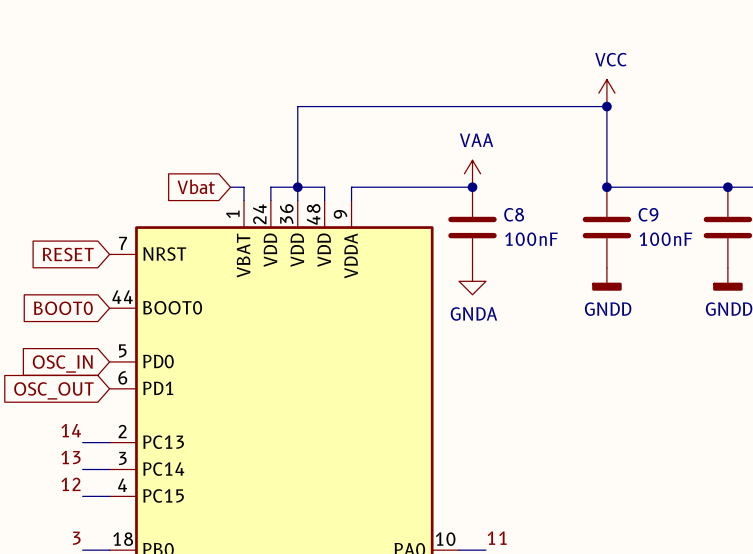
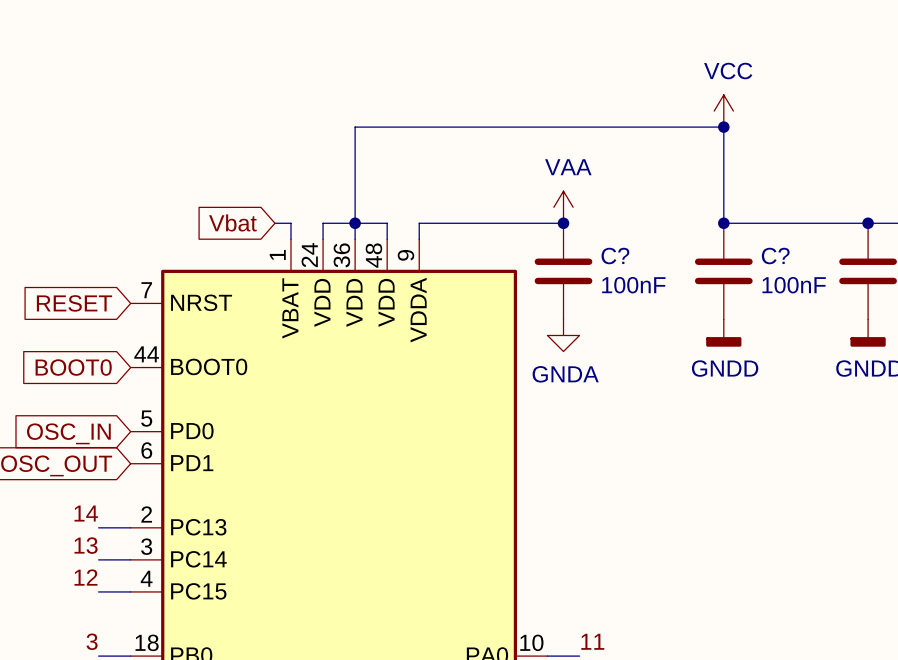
C8 name: C8 (514, 214) -> C? (615, 256)
C9 name: C9 (648, 214) -> C? (775, 256)

